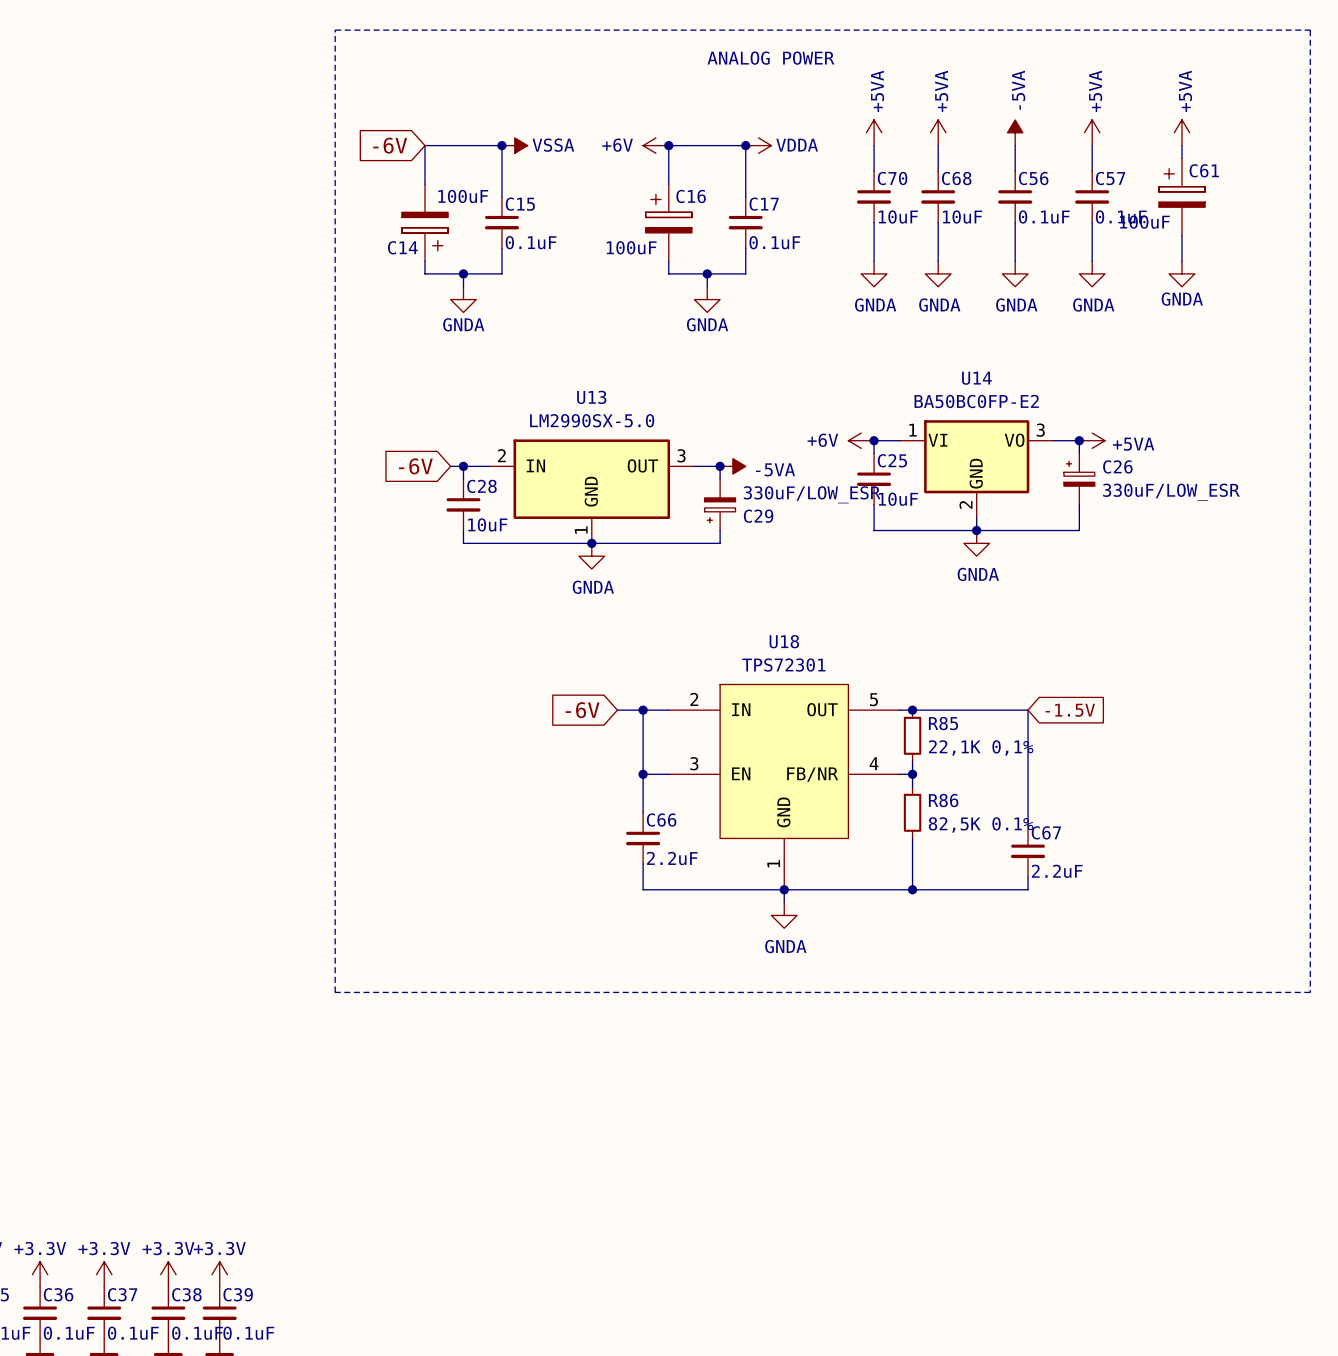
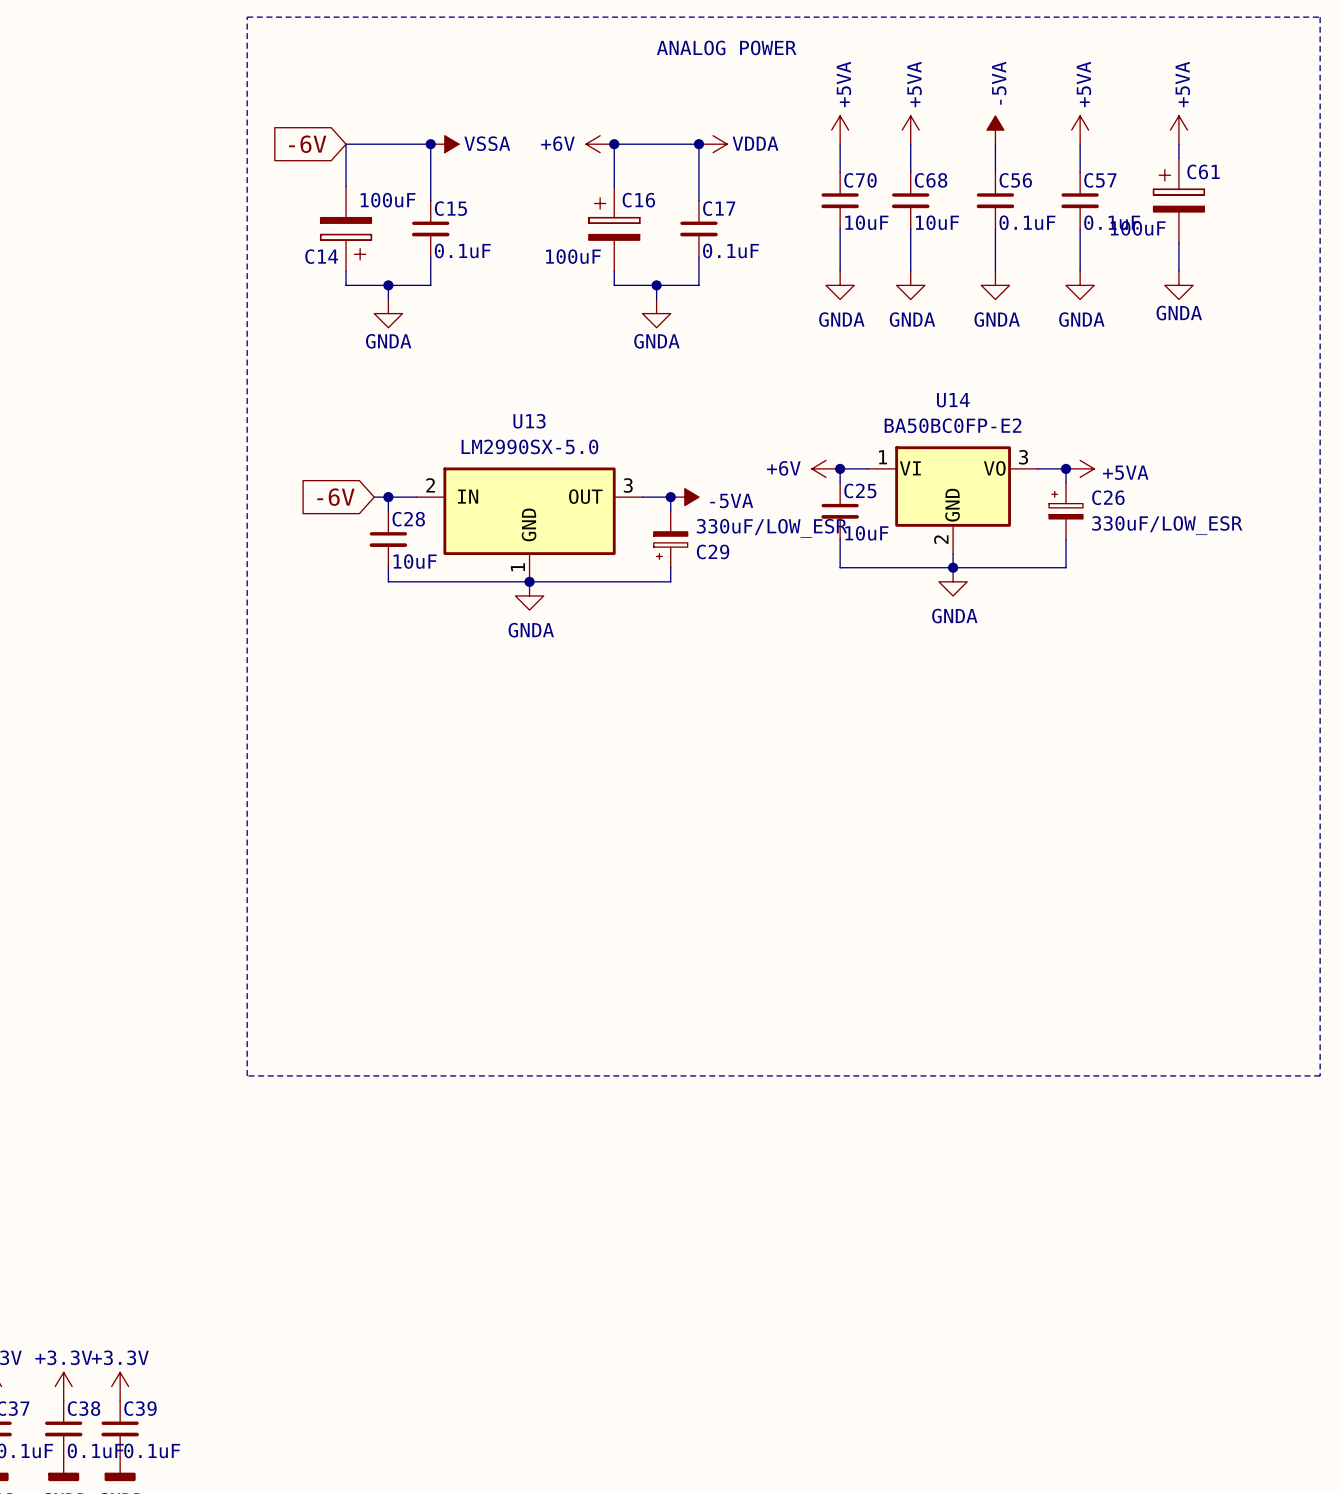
global label: -6V (582, 710) -> none
wire: (617, 710) (668, 710) -> none
wire: (643, 710) (643, 812) -> none
junction: (643, 710) -> none
wire: (899, 710) (1028, 710) (1028, 825) -> none
junction: (912, 710) -> none
global label: -1.5V (1070, 710) -> none
R85: 22,1K 0,1% (912, 735) -> none
wire: (912, 761) (912, 787) -> none
wire: (643, 774) (668, 774) -> none
junction: (643, 774) -> none
wire: (899, 774) (912, 774) -> none
junction: (912, 774) -> none
U18: TPS72301 (784, 787) -> none
R86: 82,5K 0.1% (912, 812) -> none
C66: 2.2uF (643, 838) -> none
wire: (912, 838) (912, 889) -> none
C67: 2.2uF (1028, 851) -> none
wire: (643, 864) (643, 889) (1028, 889) (1028, 876) -> none
wire: (784, 889) (784, 902) -> none
junction: (784, 889) -> none
junction: (912, 889) -> none
power symbol: GNDA (784, 915) -> none

